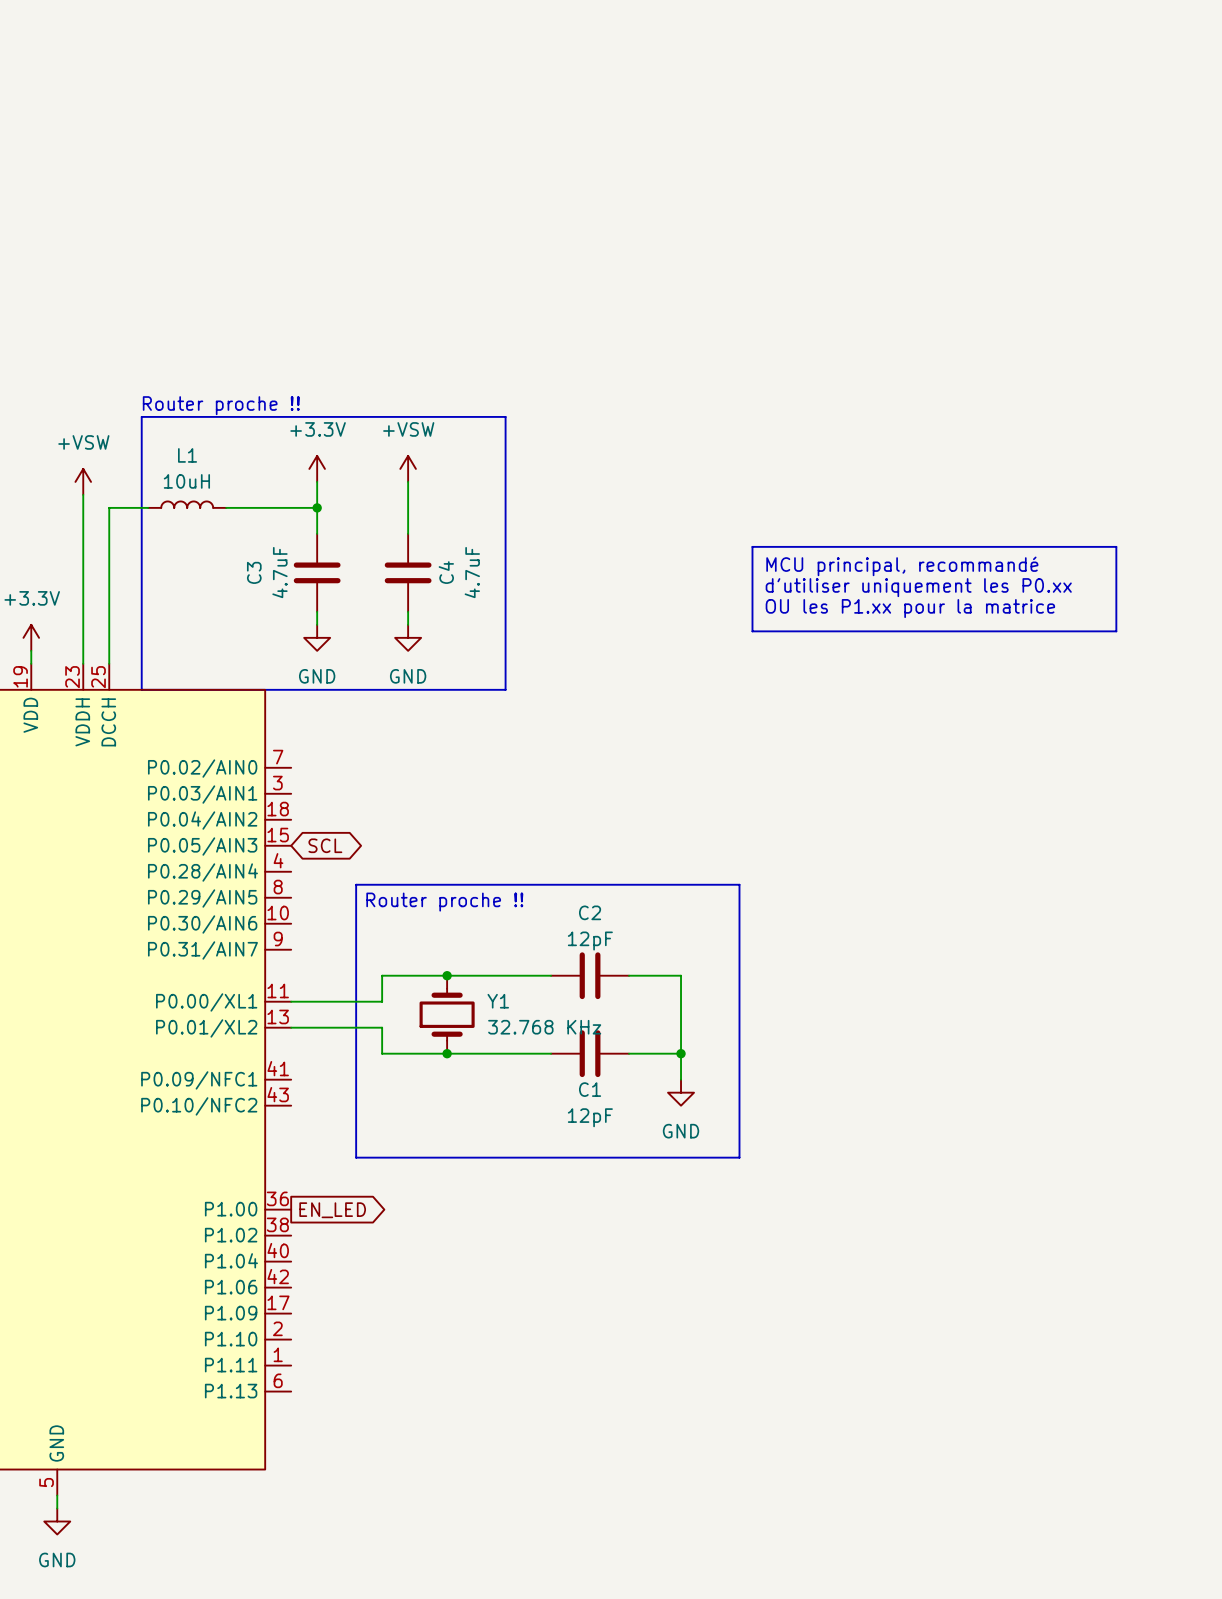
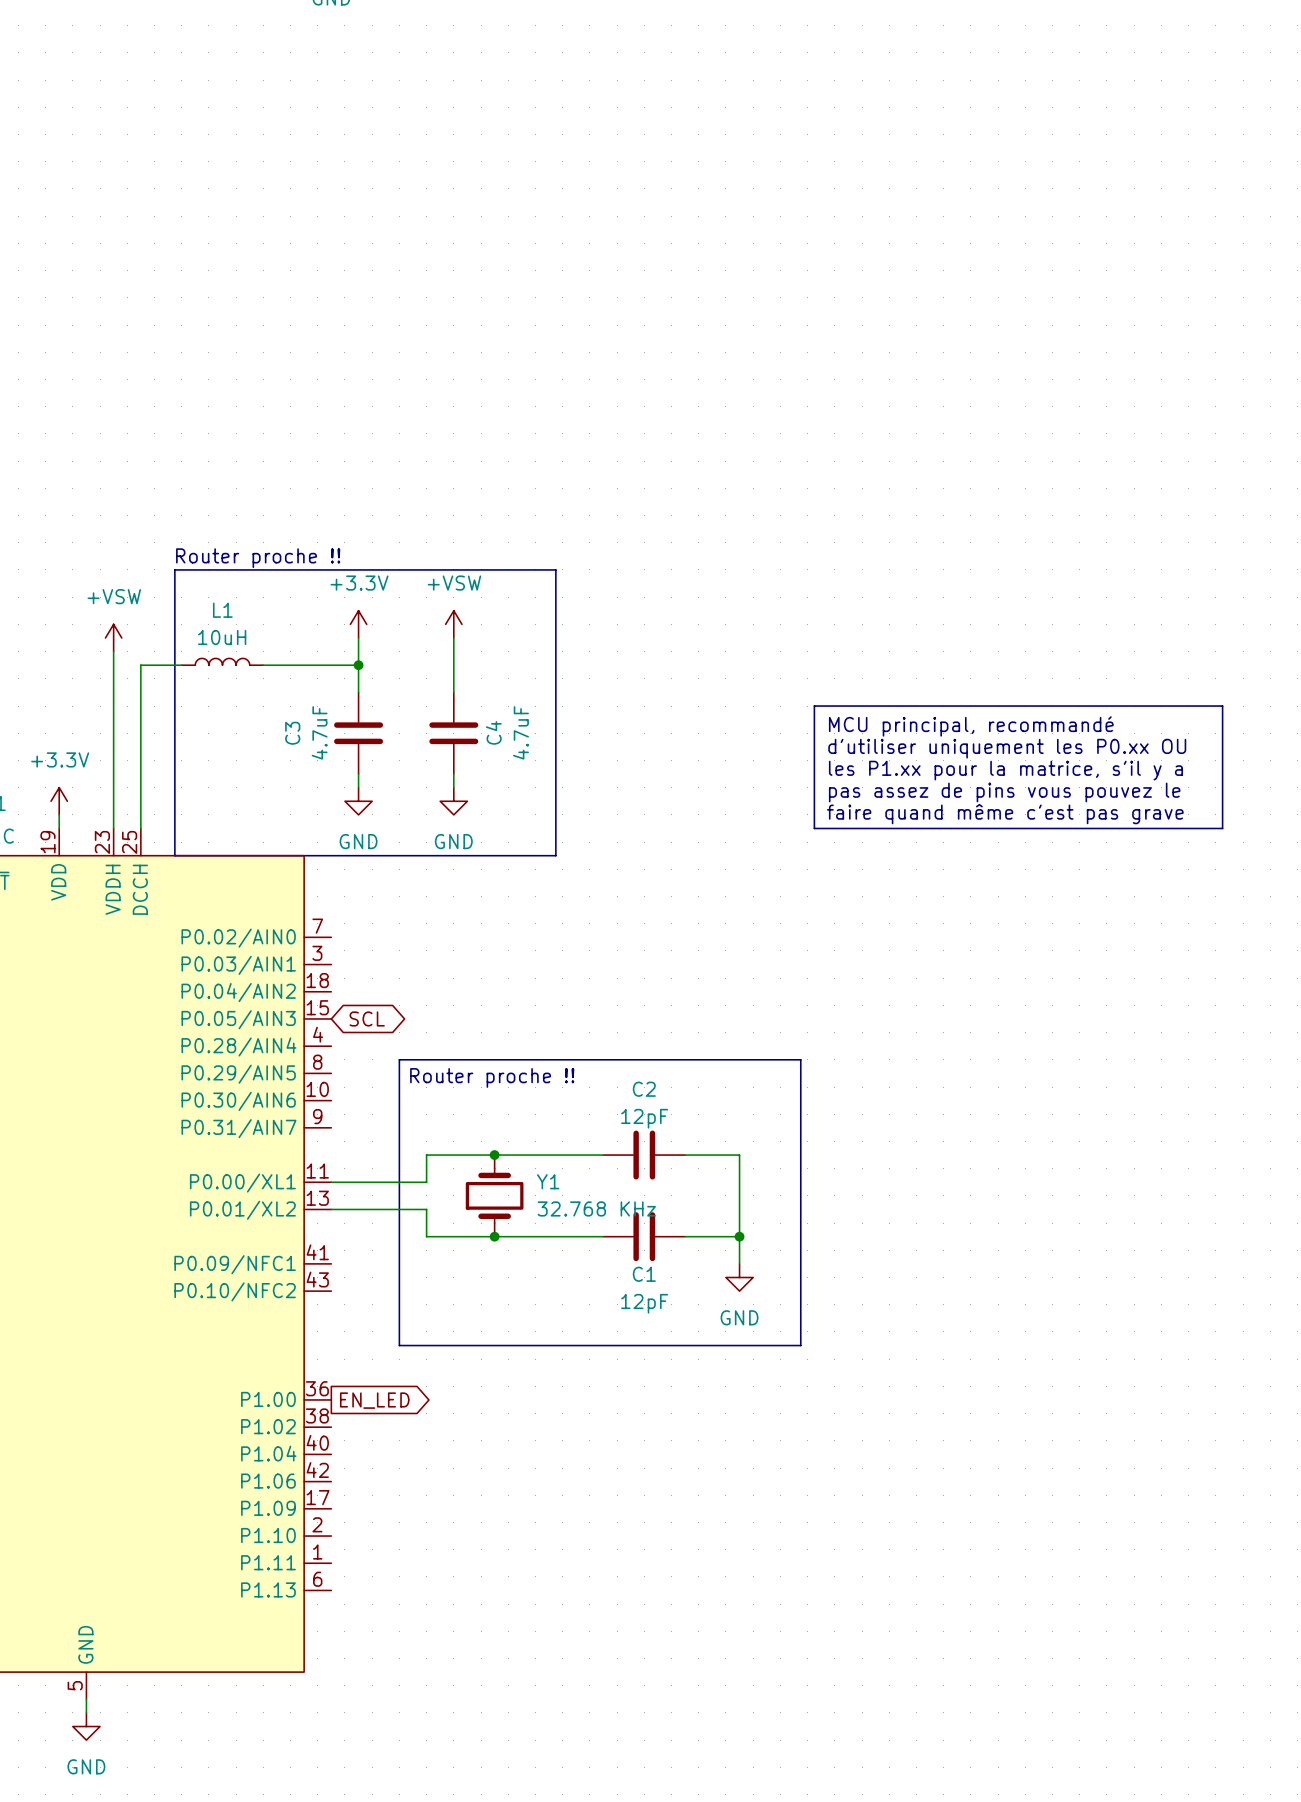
line: (1116, 546) (1116, 631) (752, 631) -> (1195, 706) (1222, 706) (1222, 828) (814, 828) (814, 794)
text: d'utiliser uniquement les P0.xx (918, 587) -> d'utiliser uniquement les P0.xx OU (1007, 748)
text: OU les P1.xx pour la matrice (910, 608) -> les P1.xx pour la matrice, s'il y a (1005, 770)
text: none -> pas assez de pins vous pouvez le (1004, 792)
text: none -> faire quand même c'est pas grave (1005, 814)

